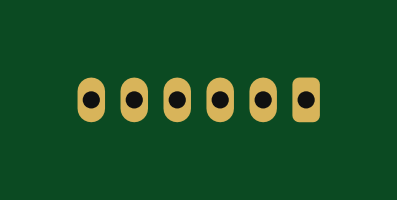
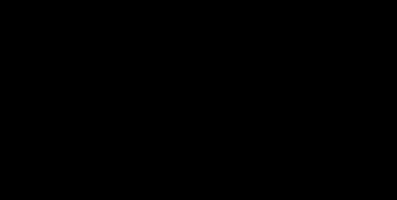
part: (198, 99) -> none

